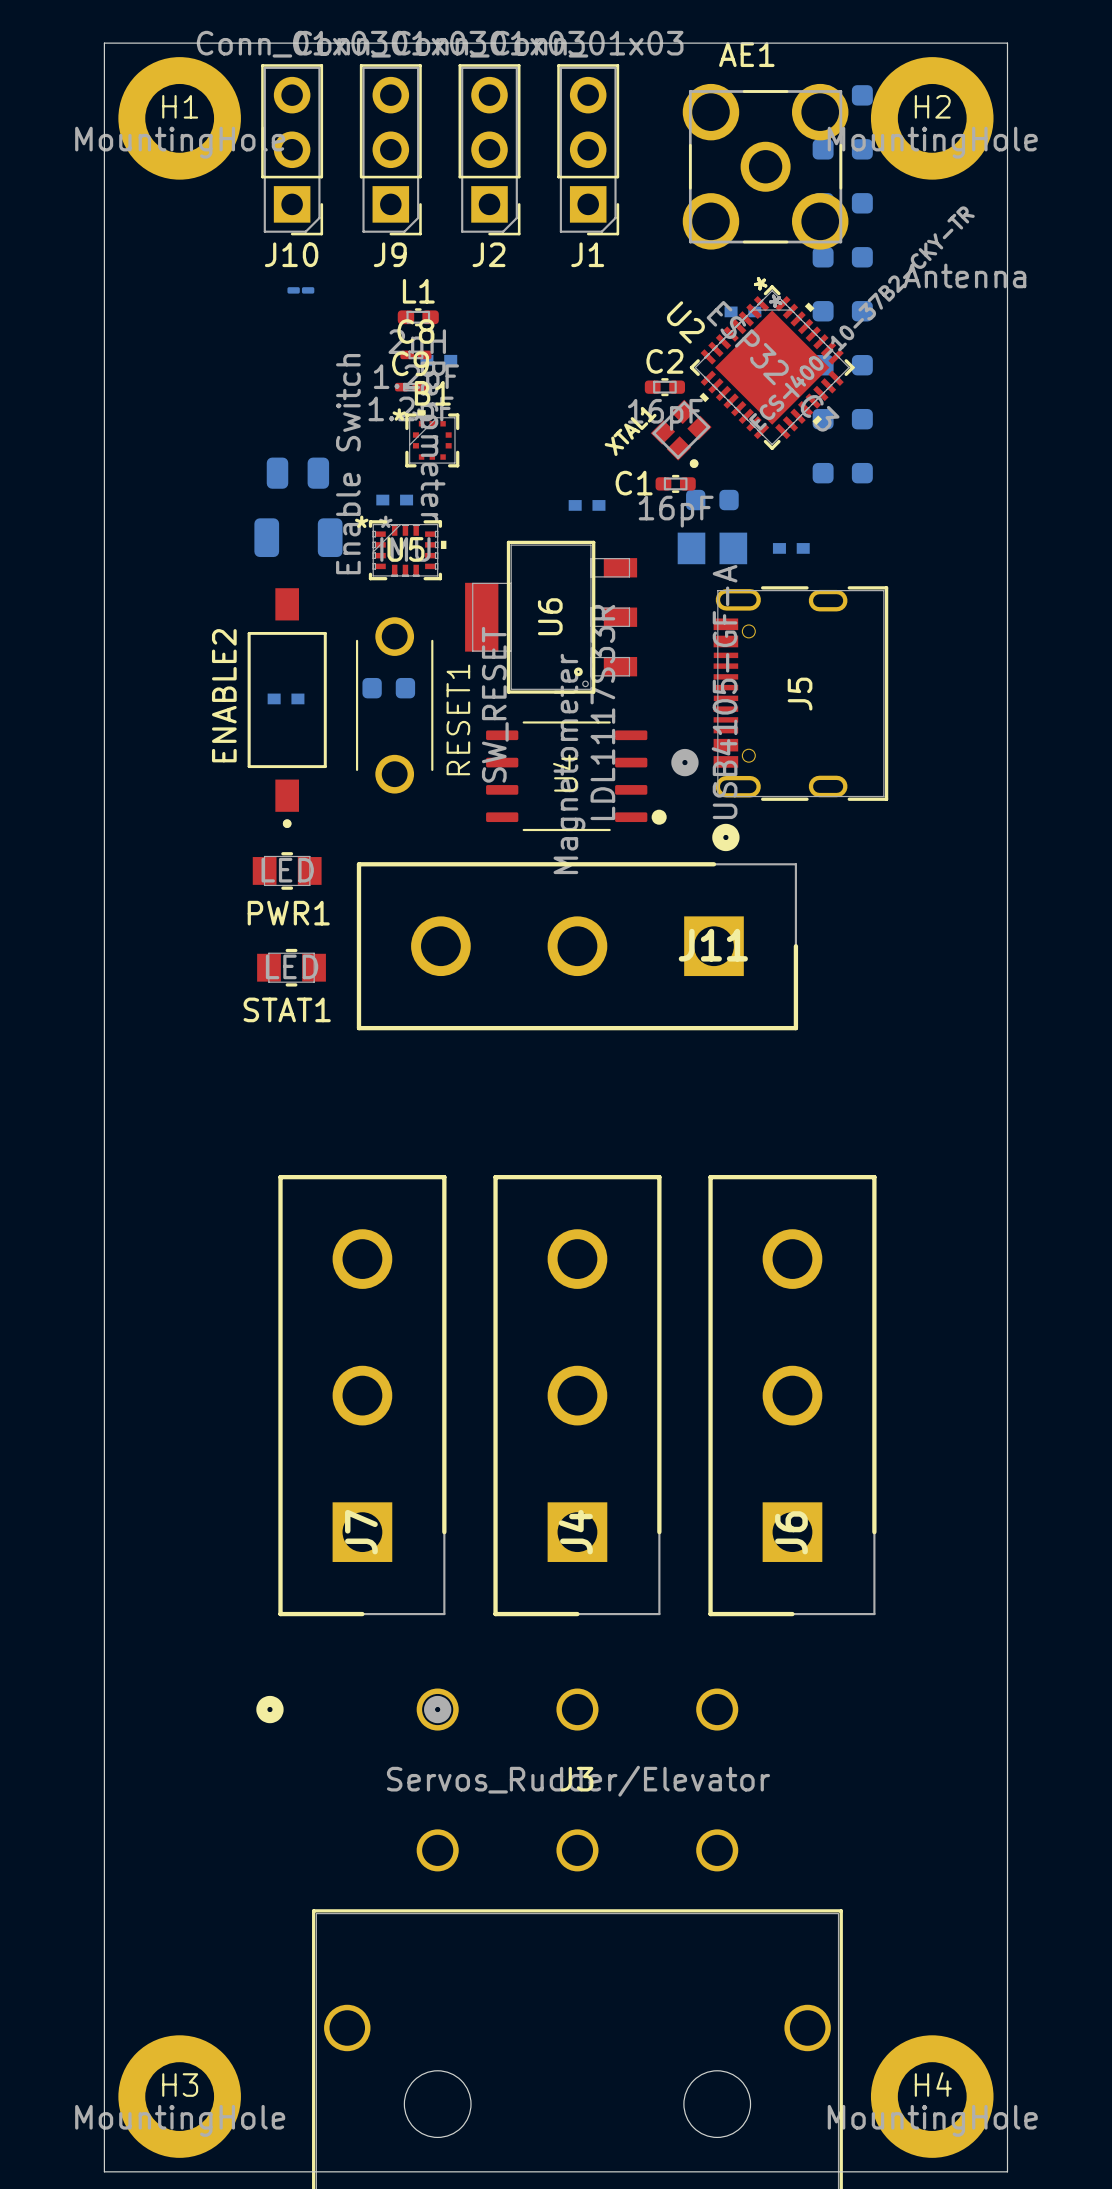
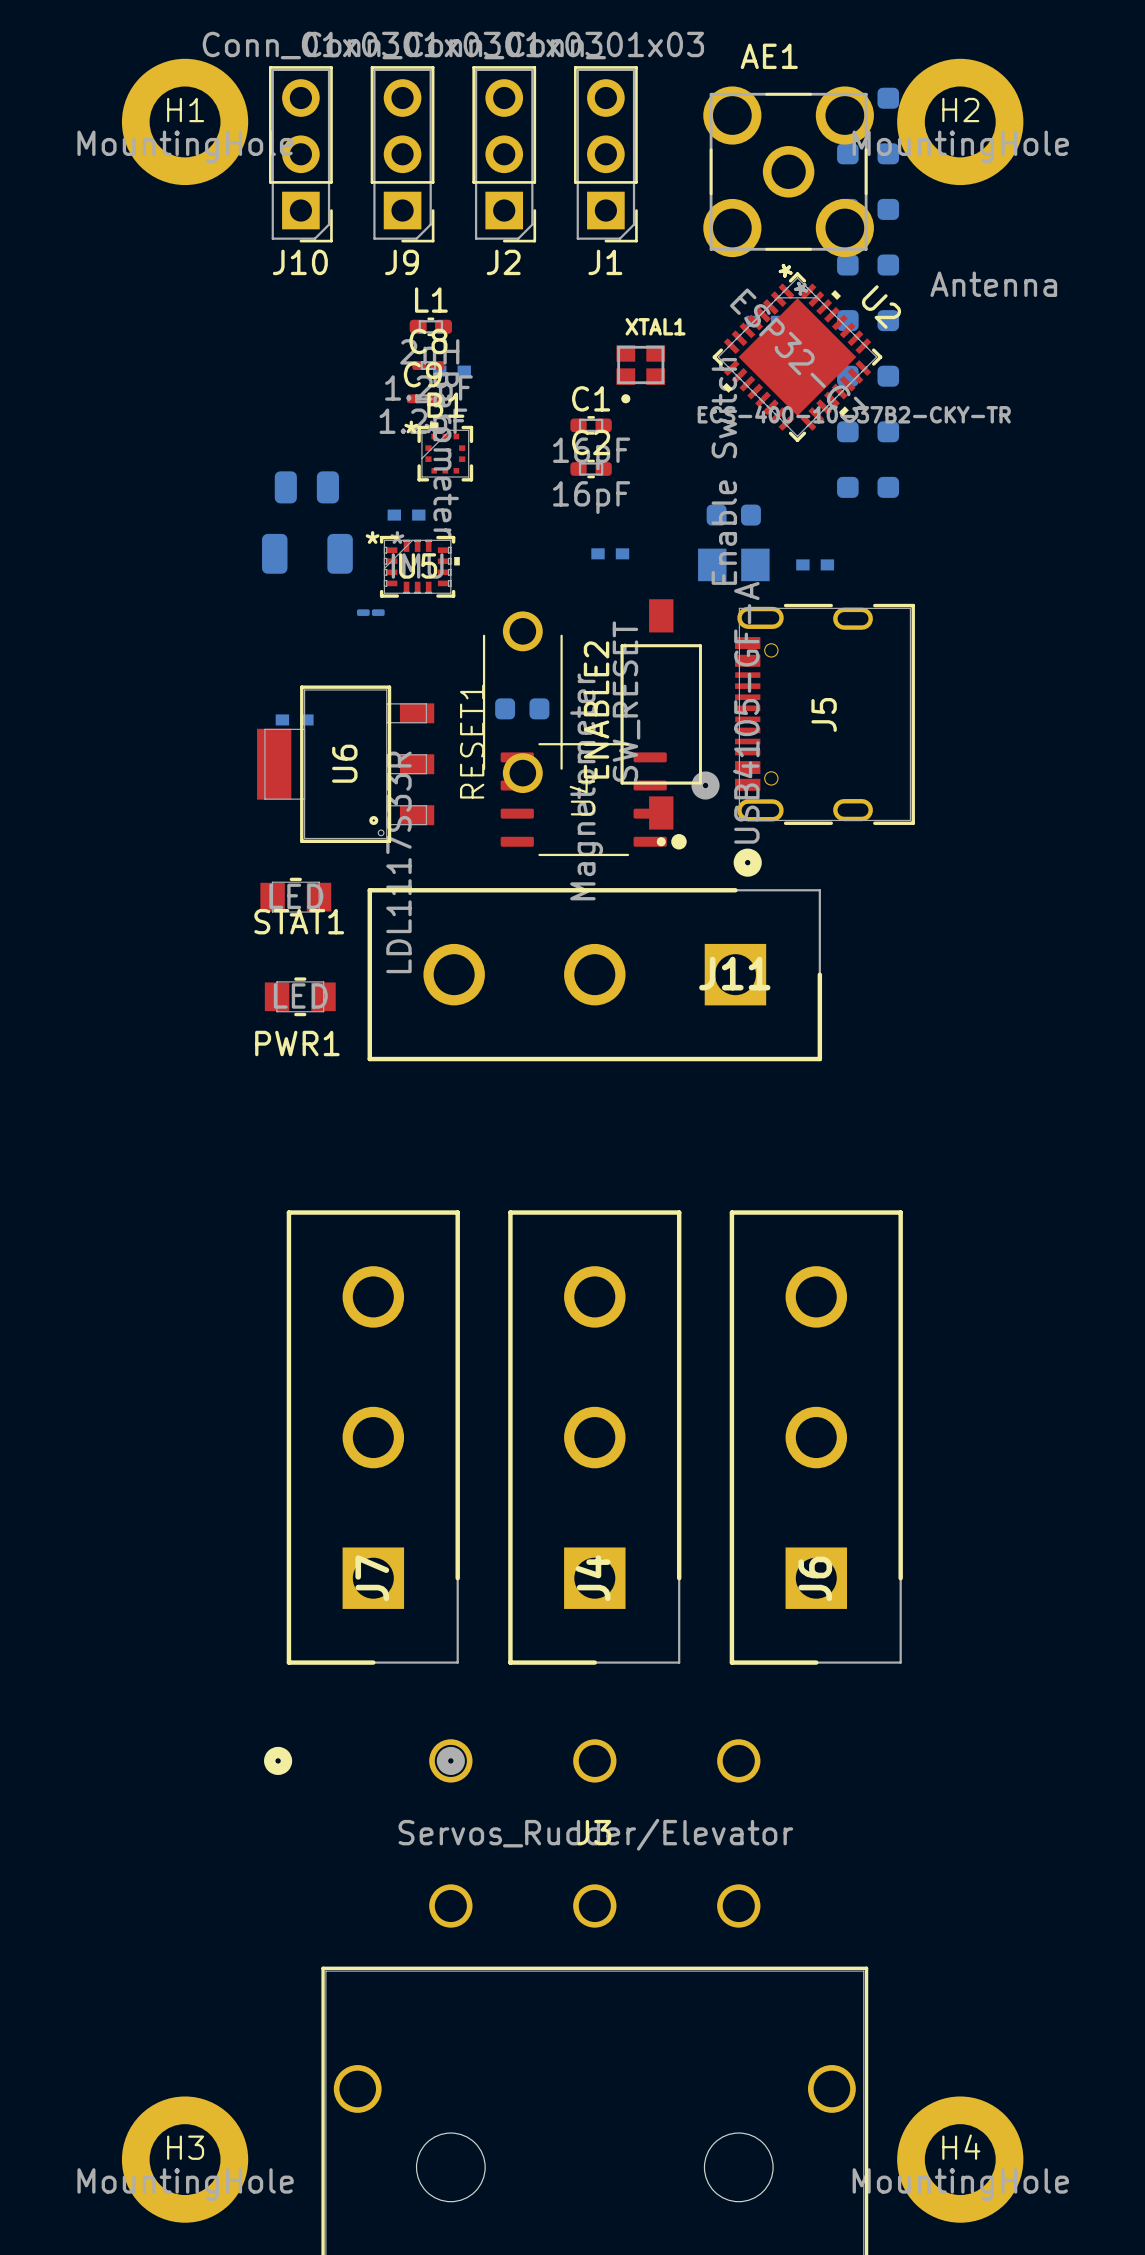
board edge: (104, 43) (1007, 43) (1007, 2171) (104, 2171) (104, 43) -> none
part position: (300, 290) -> (370, 612)
U2 name position: U2 (685, 322) -> U2 (881, 307)
U2 position: (772, 367) -> (797, 357)
C2 position: (664, 387) -> (591, 469)
XTAL1 name position: XTAL1 (630, 431) -> XTAL1 (655, 326)
XTAL1 rotation: 0° (681, 433) -> 45° clockwise (640, 374)
XTAL1 position: (681, 433) -> (640, 374)
C1 name position: C1 (634, 483) -> C1 (591, 398)
C1 position: (675, 483) -> (591, 425)
part position: (587, 505) -> (610, 553)
U6 position: (551, 617) -> (345, 764)
part position: (388, 688) -> (522, 708)
RESET1 position: (394, 705) -> (522, 702)
ENABLE2 position: (287, 708) -> (661, 722)
PWR1 name position: PWR1 (288, 913) -> PWR1 (297, 1043)
STAT1 name position: STAT1 (287, 1009) -> STAT1 (299, 921)

